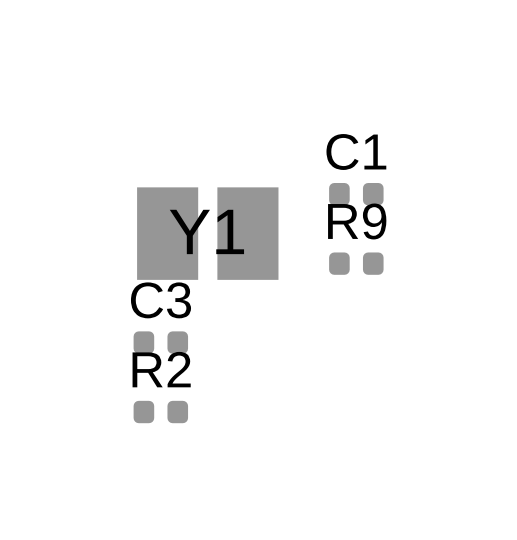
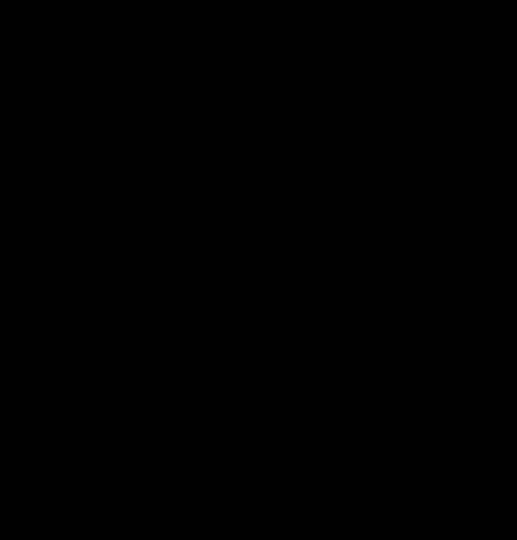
C1: (356, 194) -> none
Y1: (207, 233) -> none
R9: (356, 263) -> none
C3: (160, 342) -> none
R2: (160, 412) -> none

